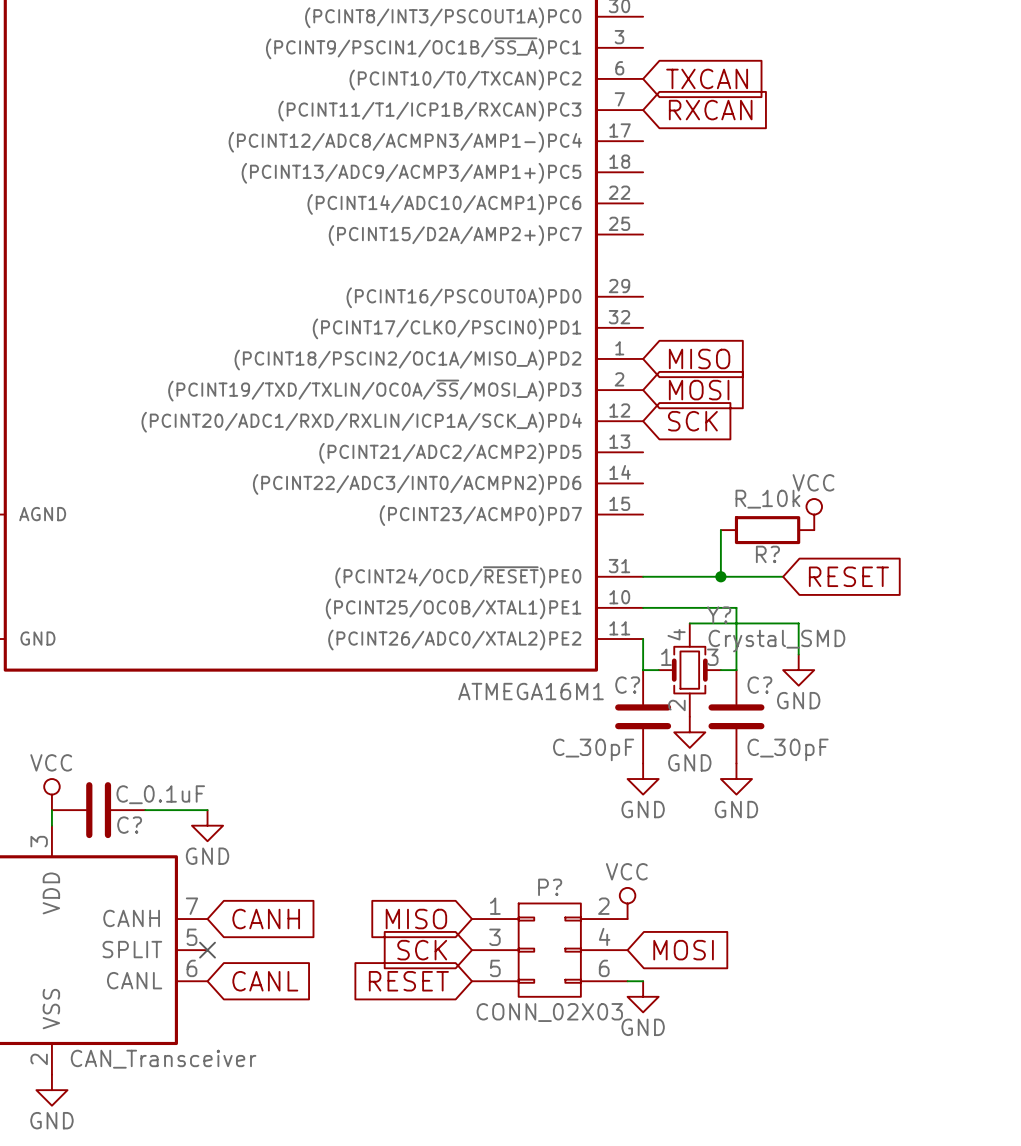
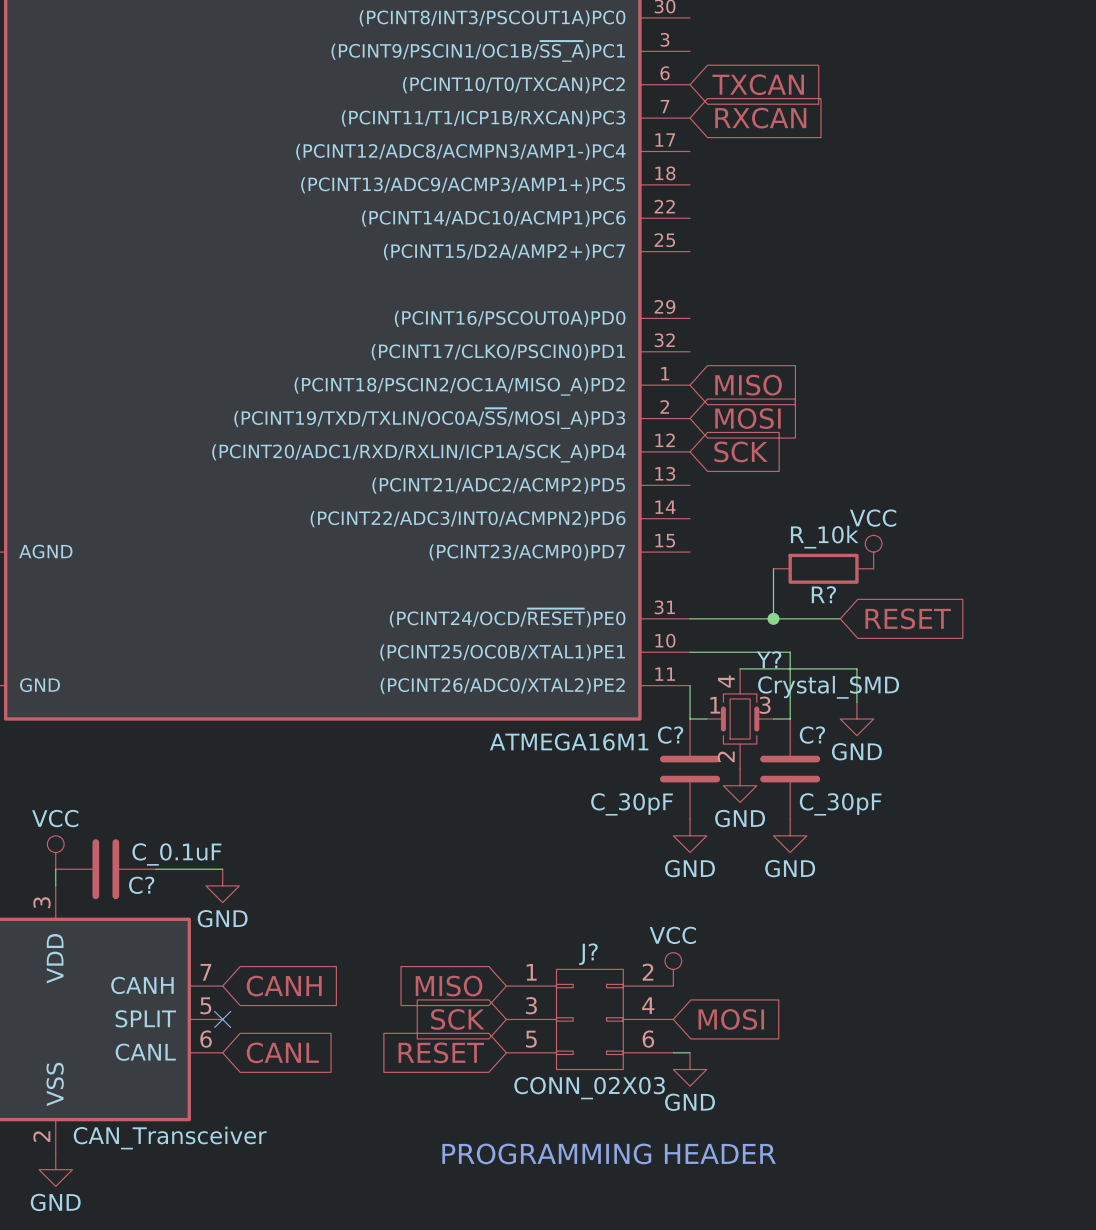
P? name: P? (550, 887) -> J? (588, 954)
text: none -> PROGRAMMING HEADER (609, 1153)

